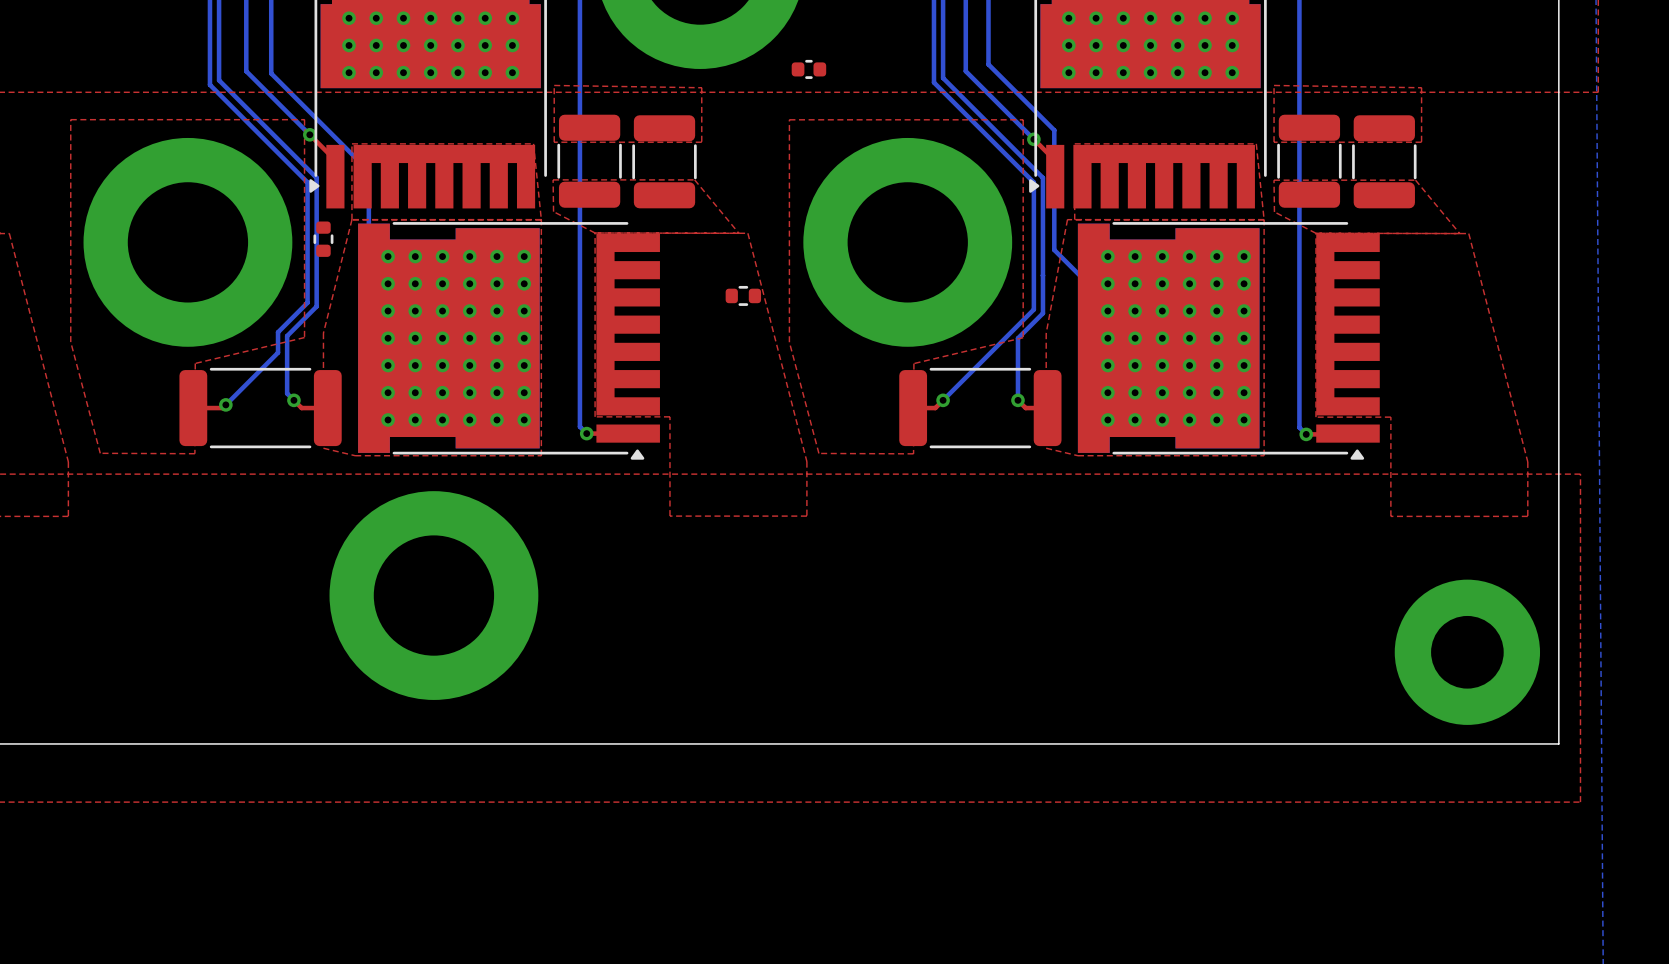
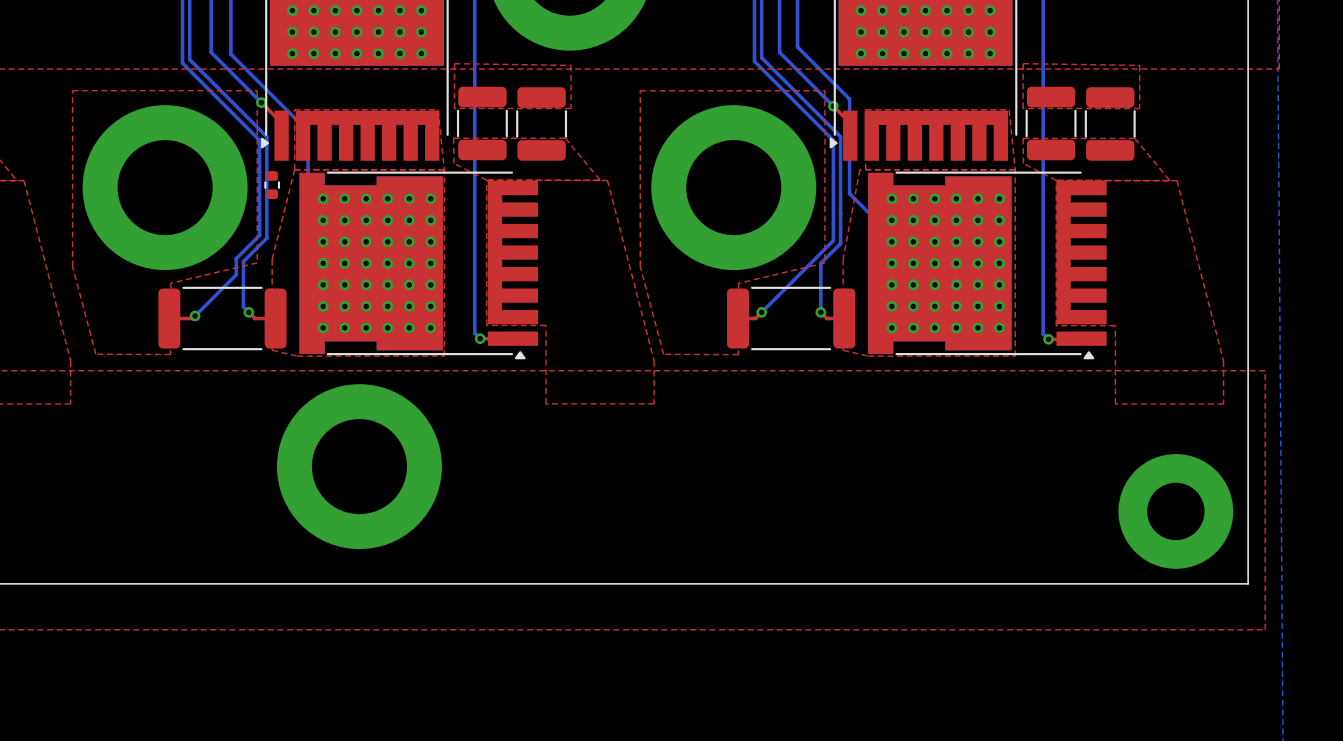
part: (808, 69) -> none
part: (743, 295) -> none

